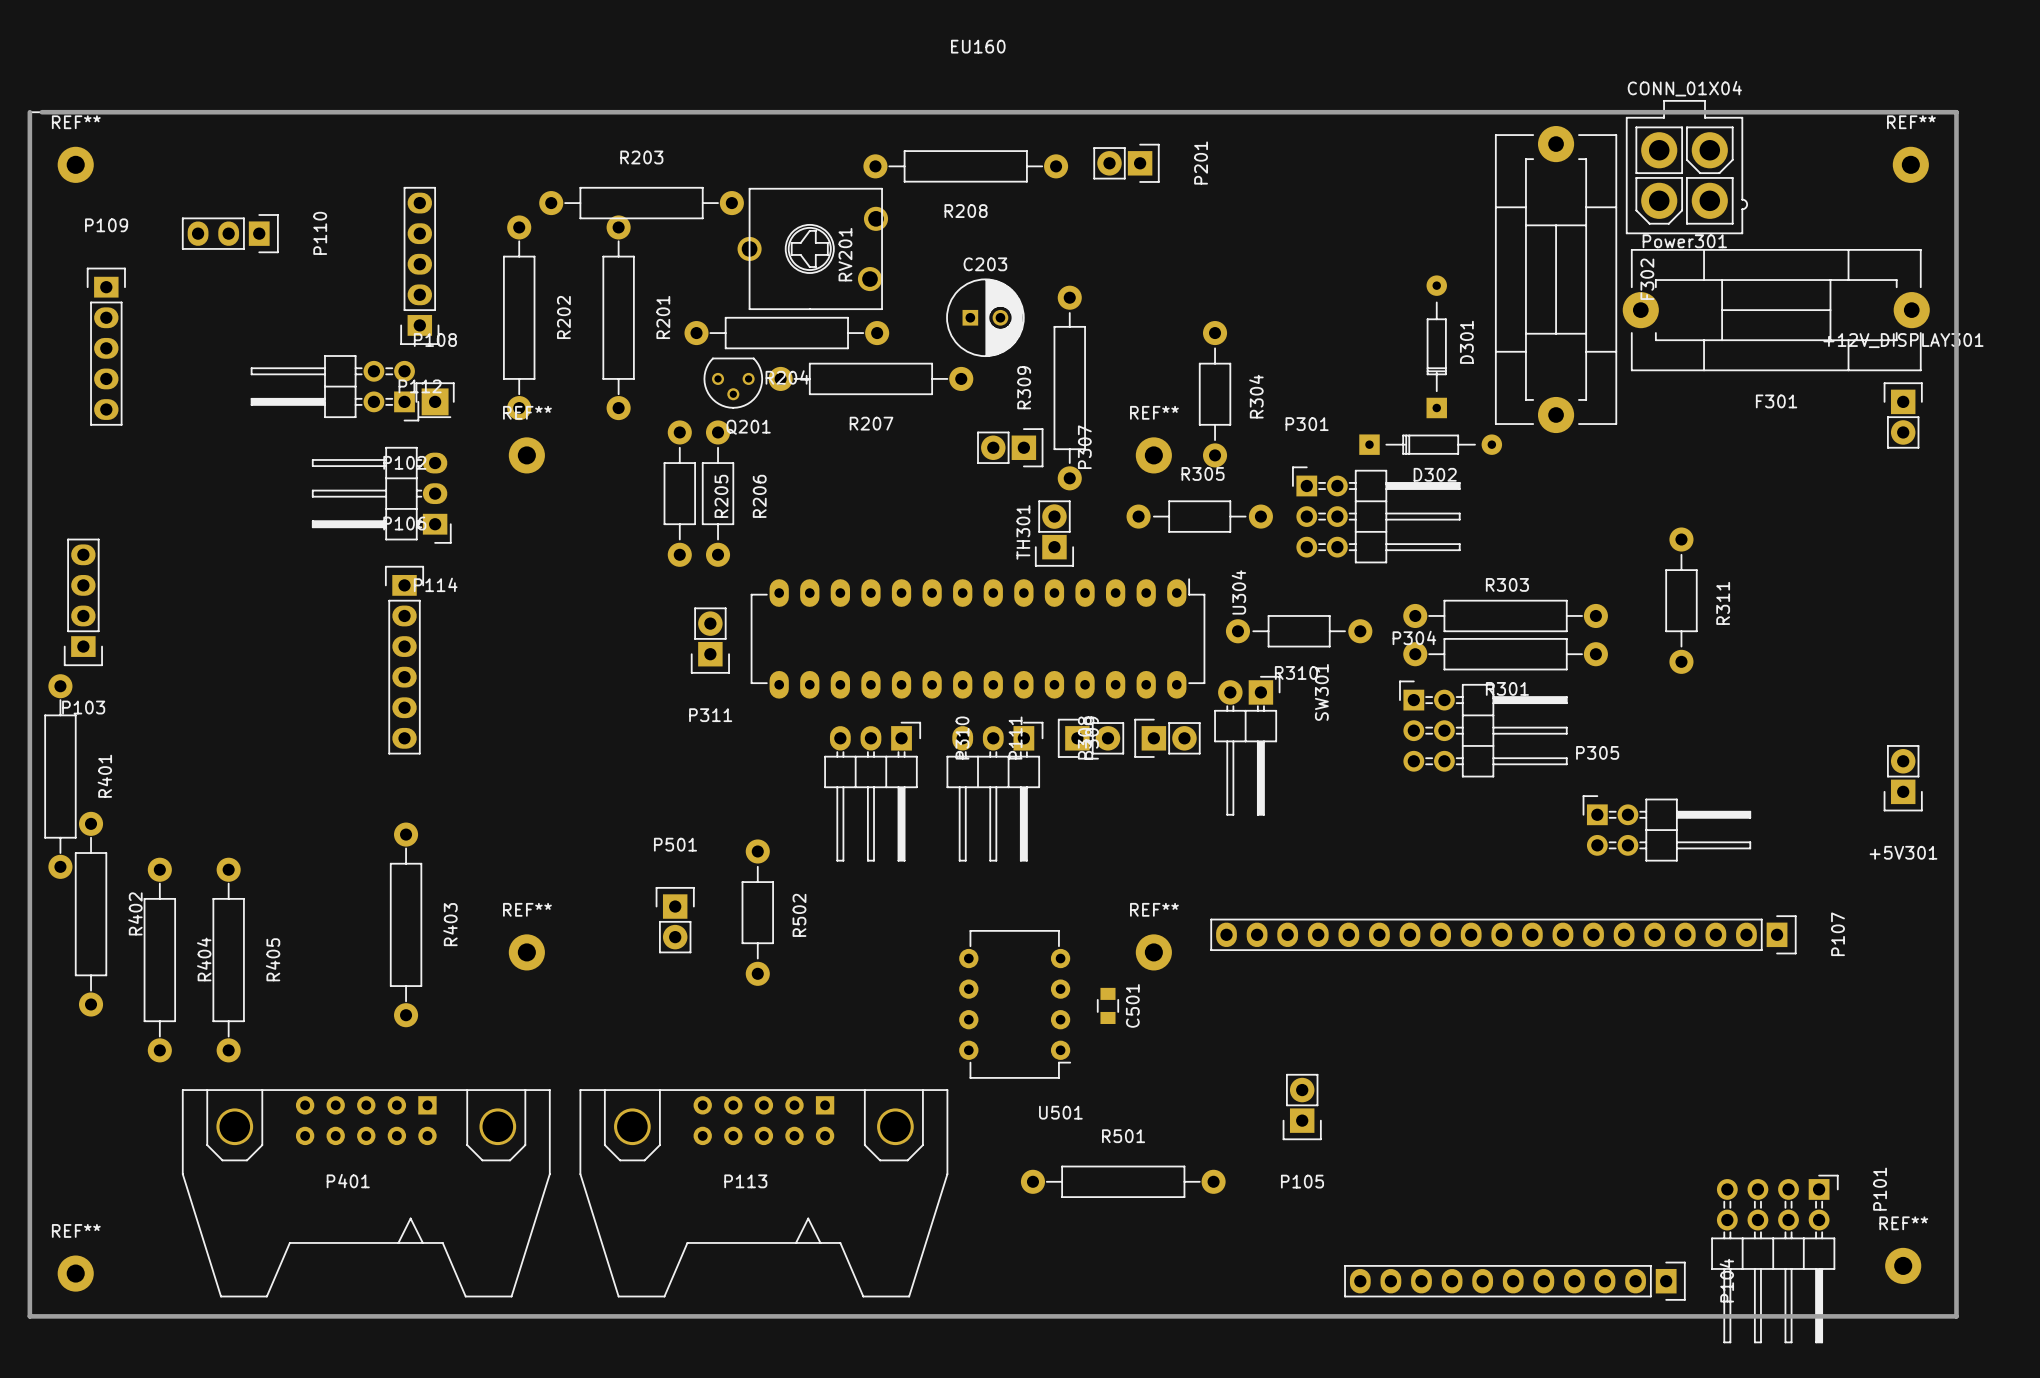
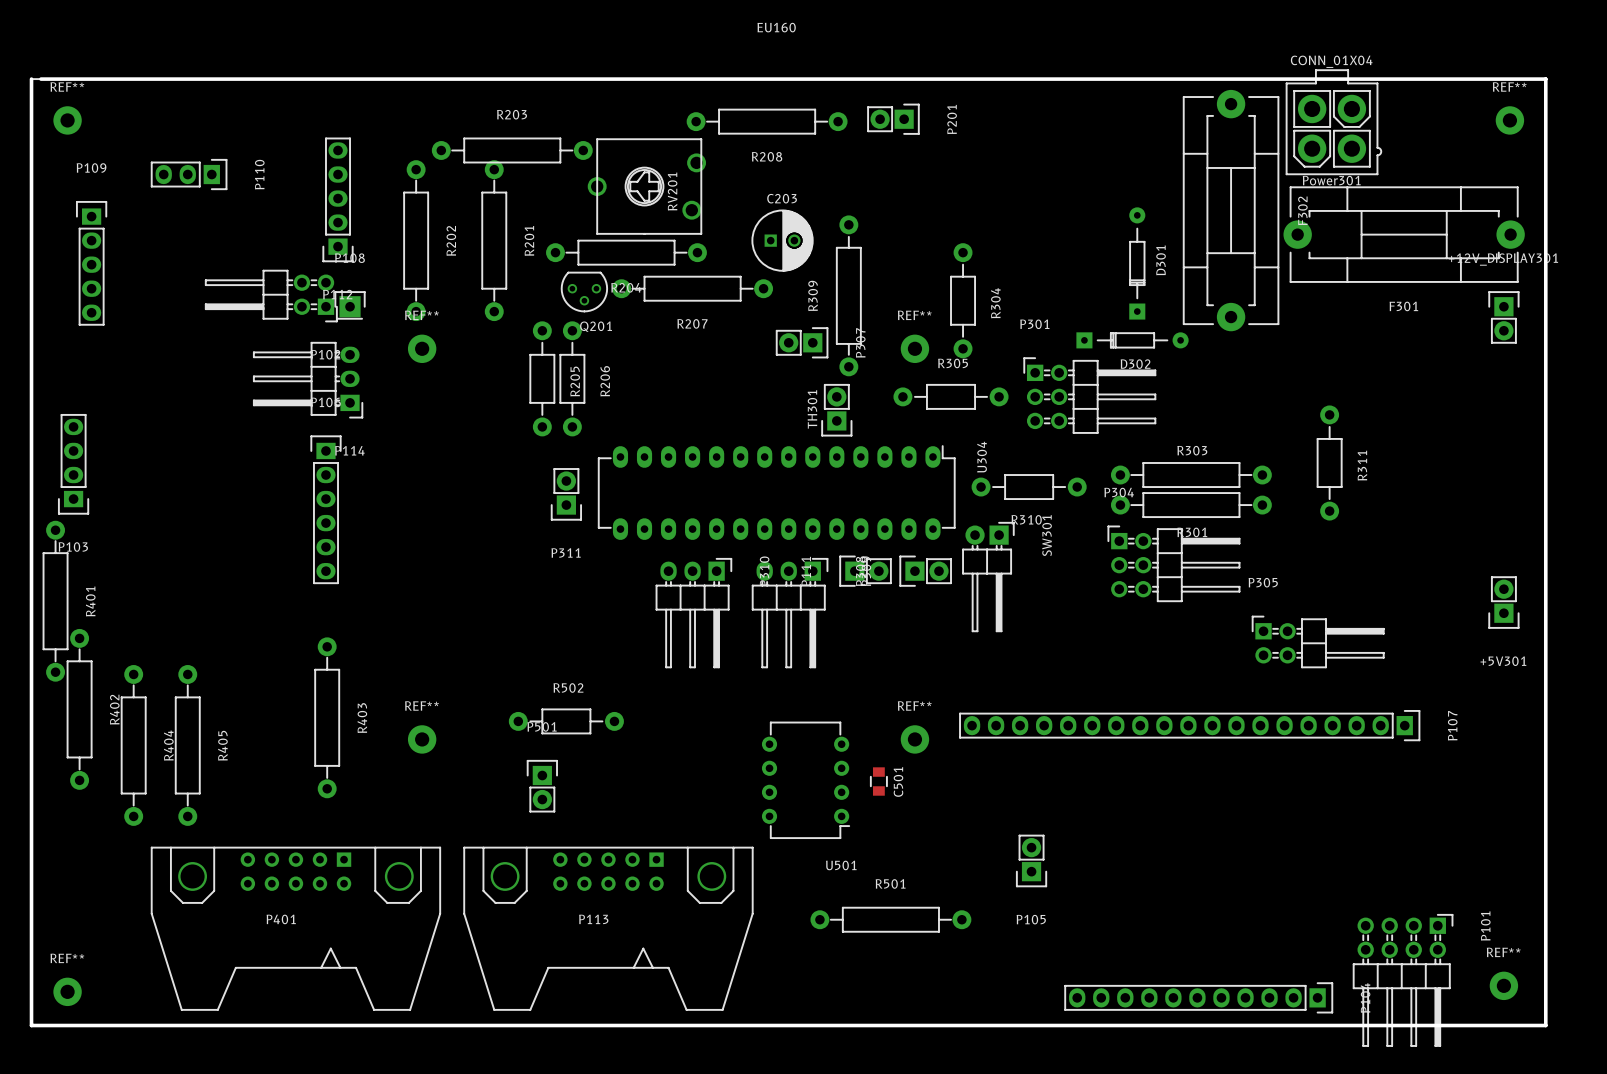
R502 rotation: 0° (757, 912) -> 90° clockwise (566, 721)
R502 name position: R502 (799, 915) -> R502 (568, 688)
P501 position: (675, 920) -> (542, 786)

